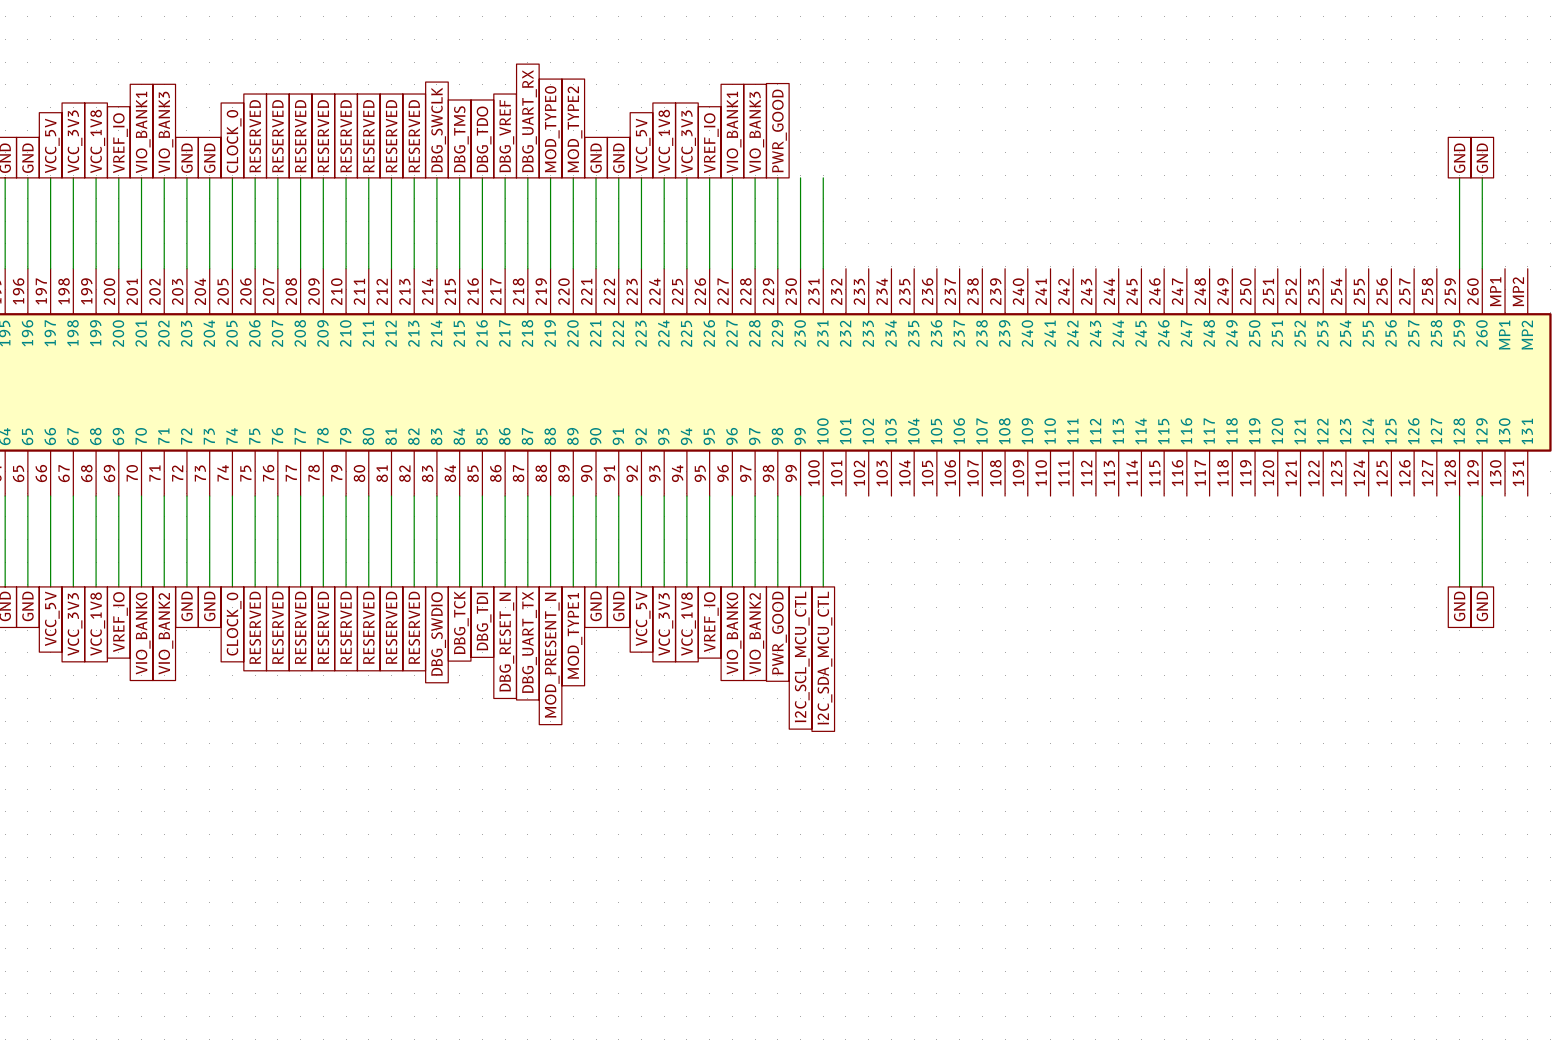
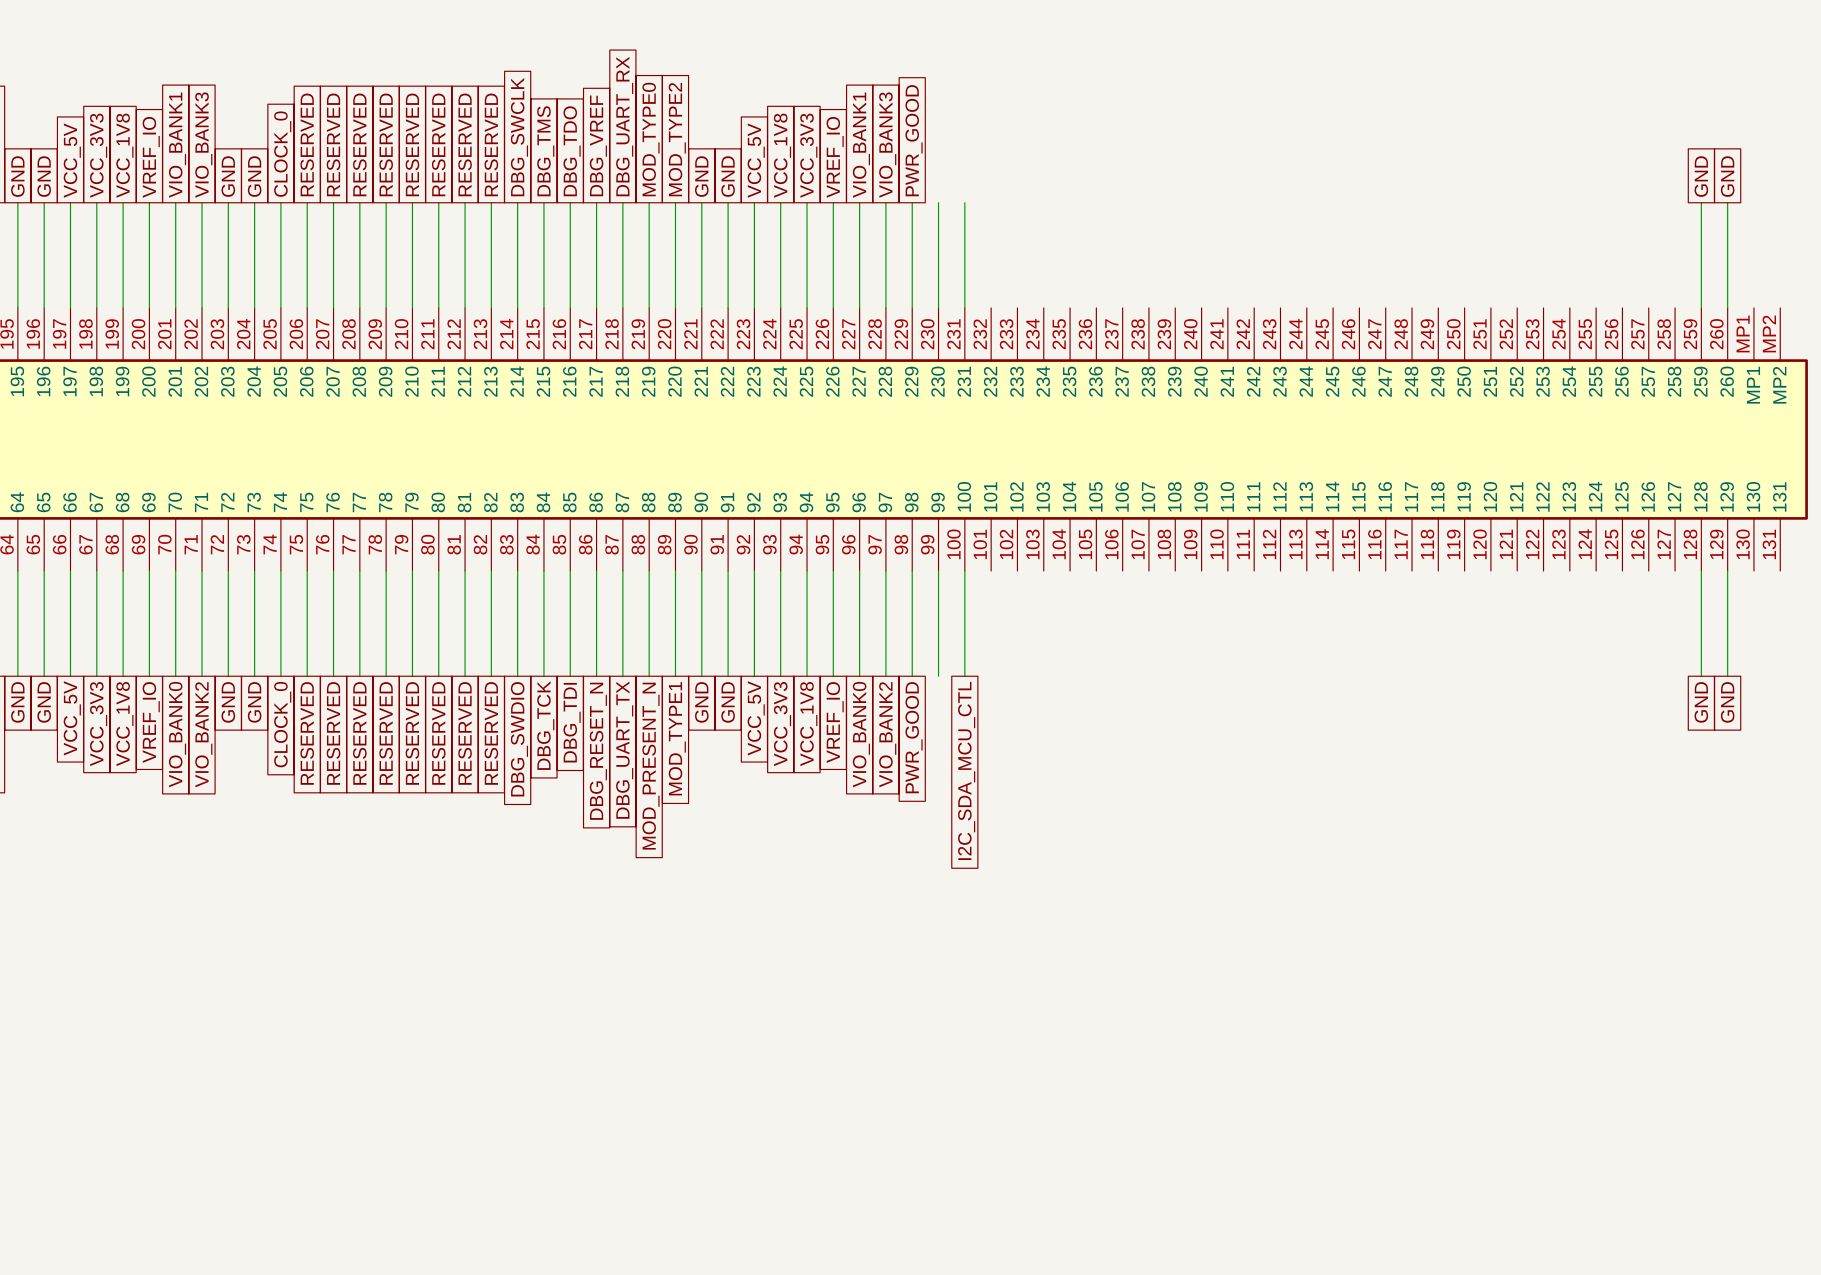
global label: I2C_SCL_MCU_CTL (802, 656) -> none

